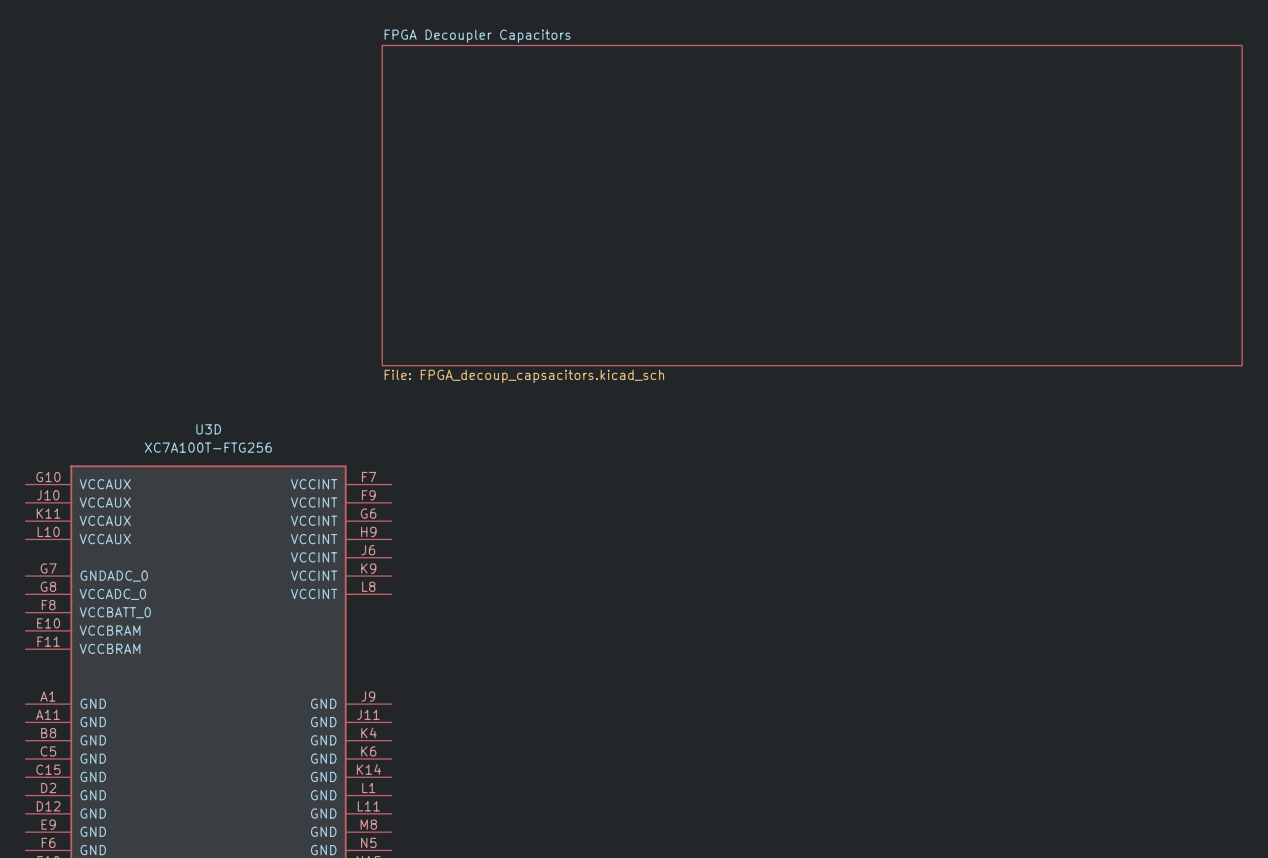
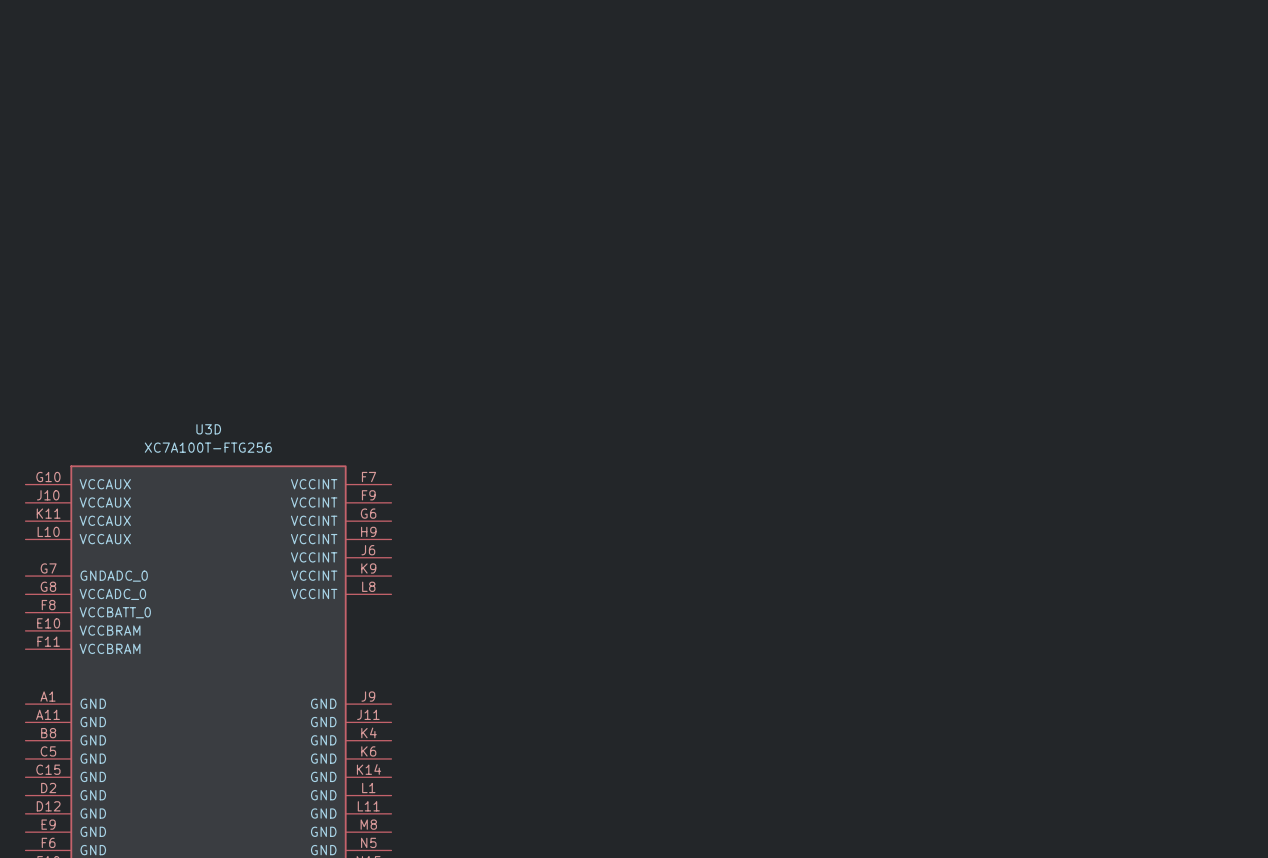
sheet FPGA Decoupler Capacitors: File: FPGA_decoup_capsacitors.kicad_sch (812, 205) -> none

